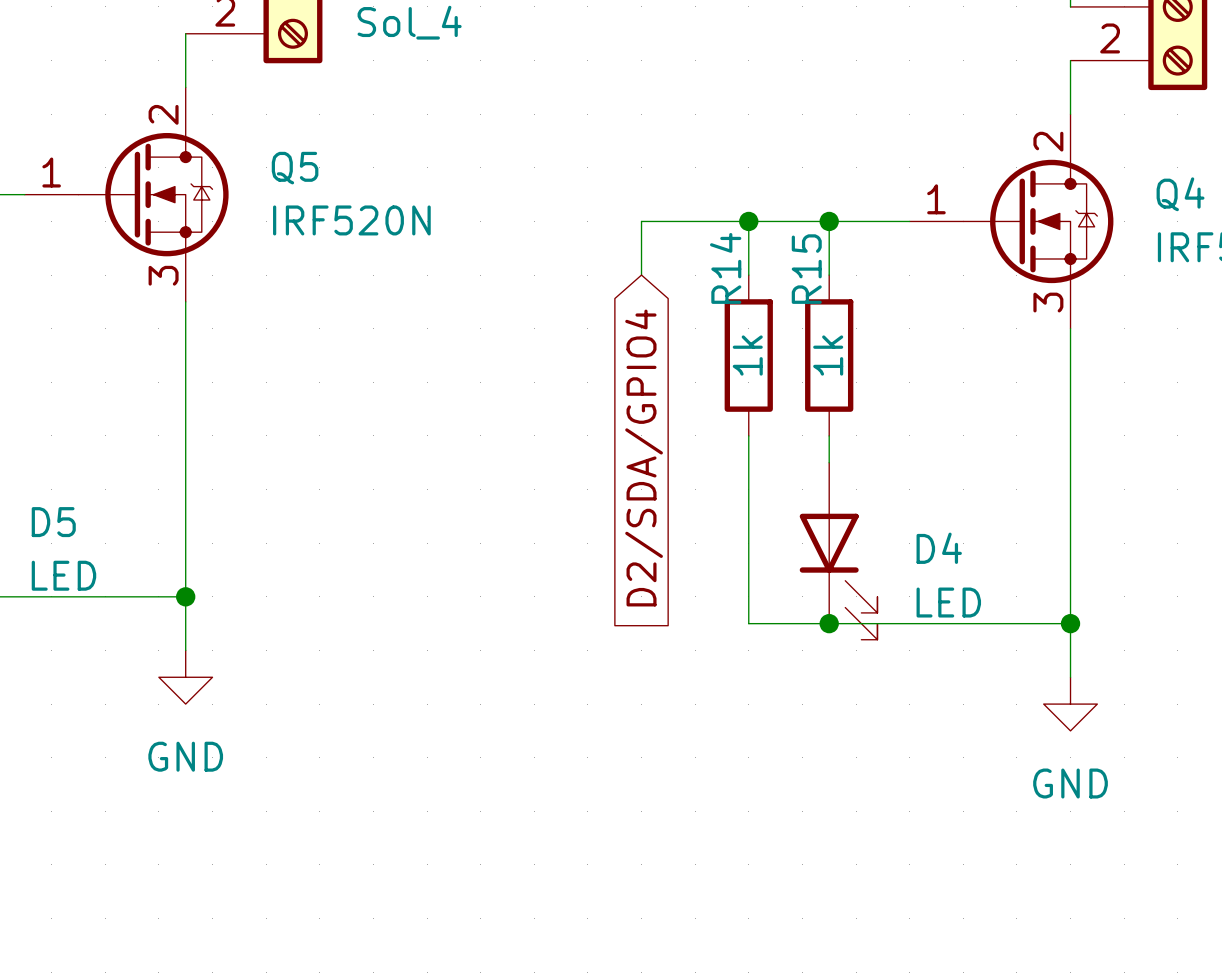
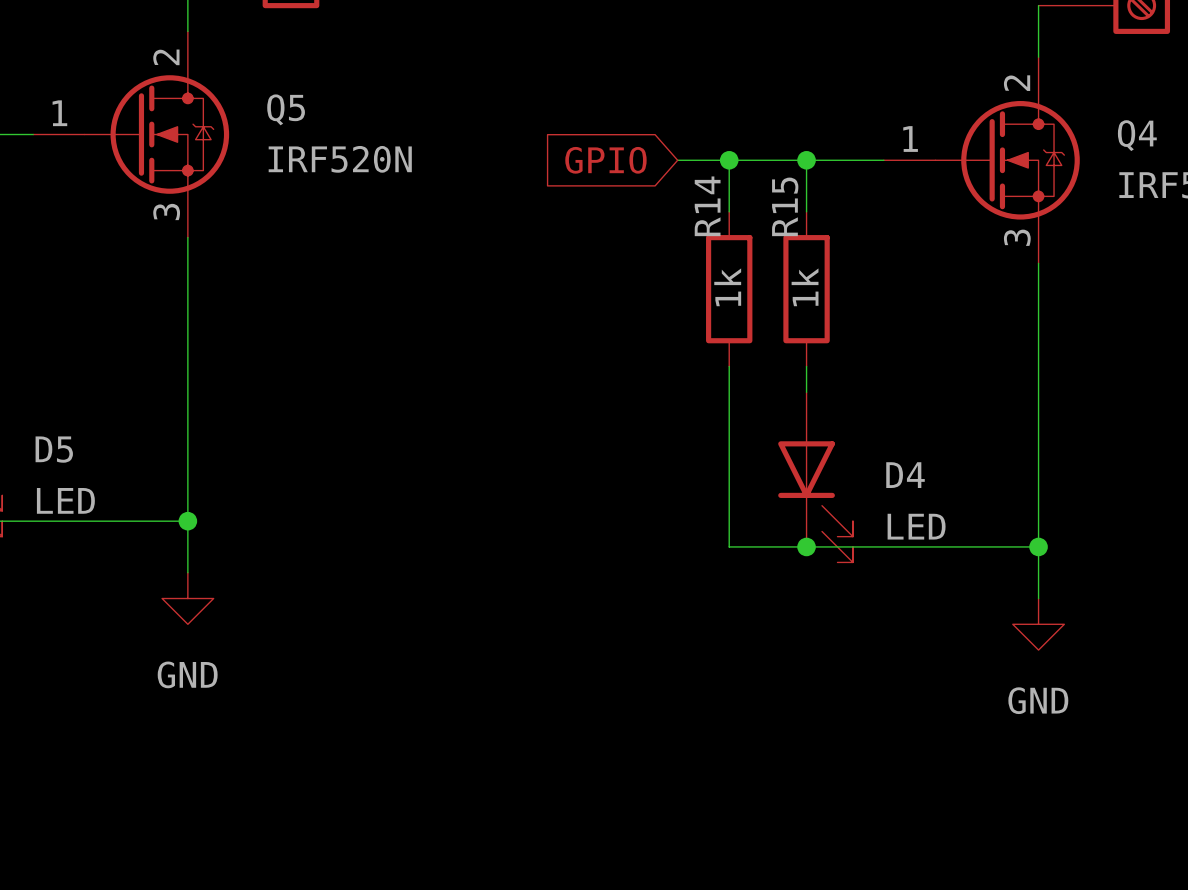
global label: none -> GPIO (605, 160)
wire: (695, 221) (641, 221) (641, 275) -> none
global label: D2/SDA/GPIO4 (644, 458) -> none

